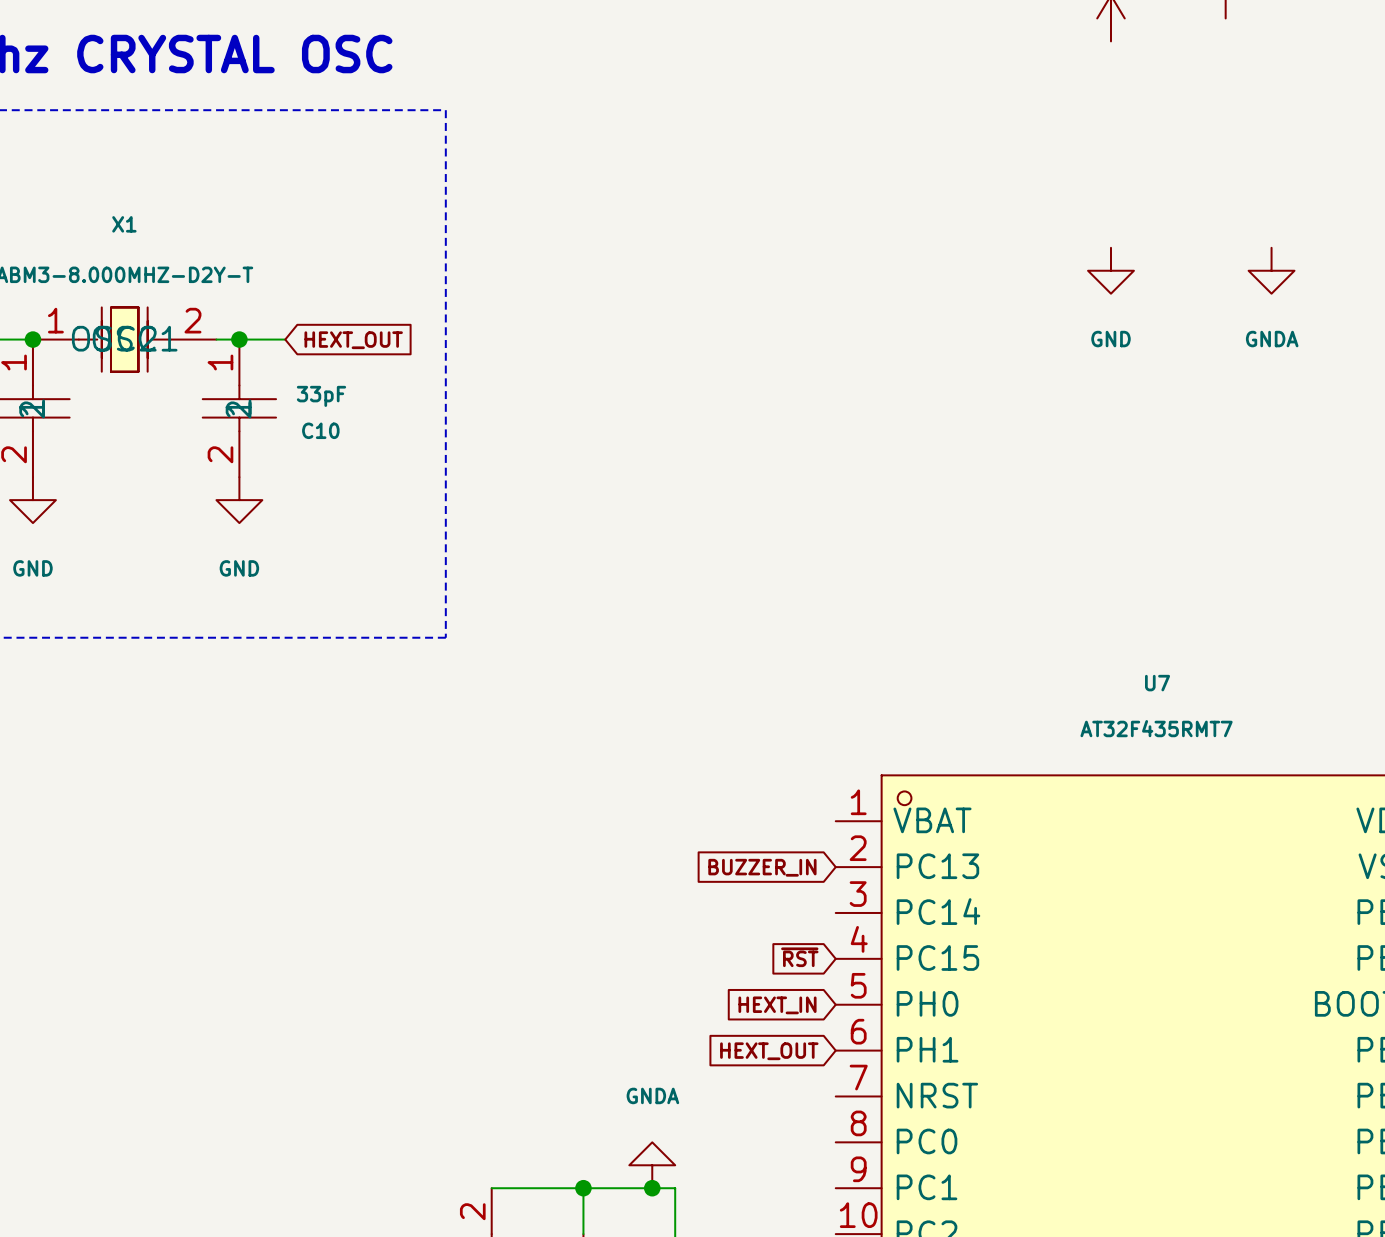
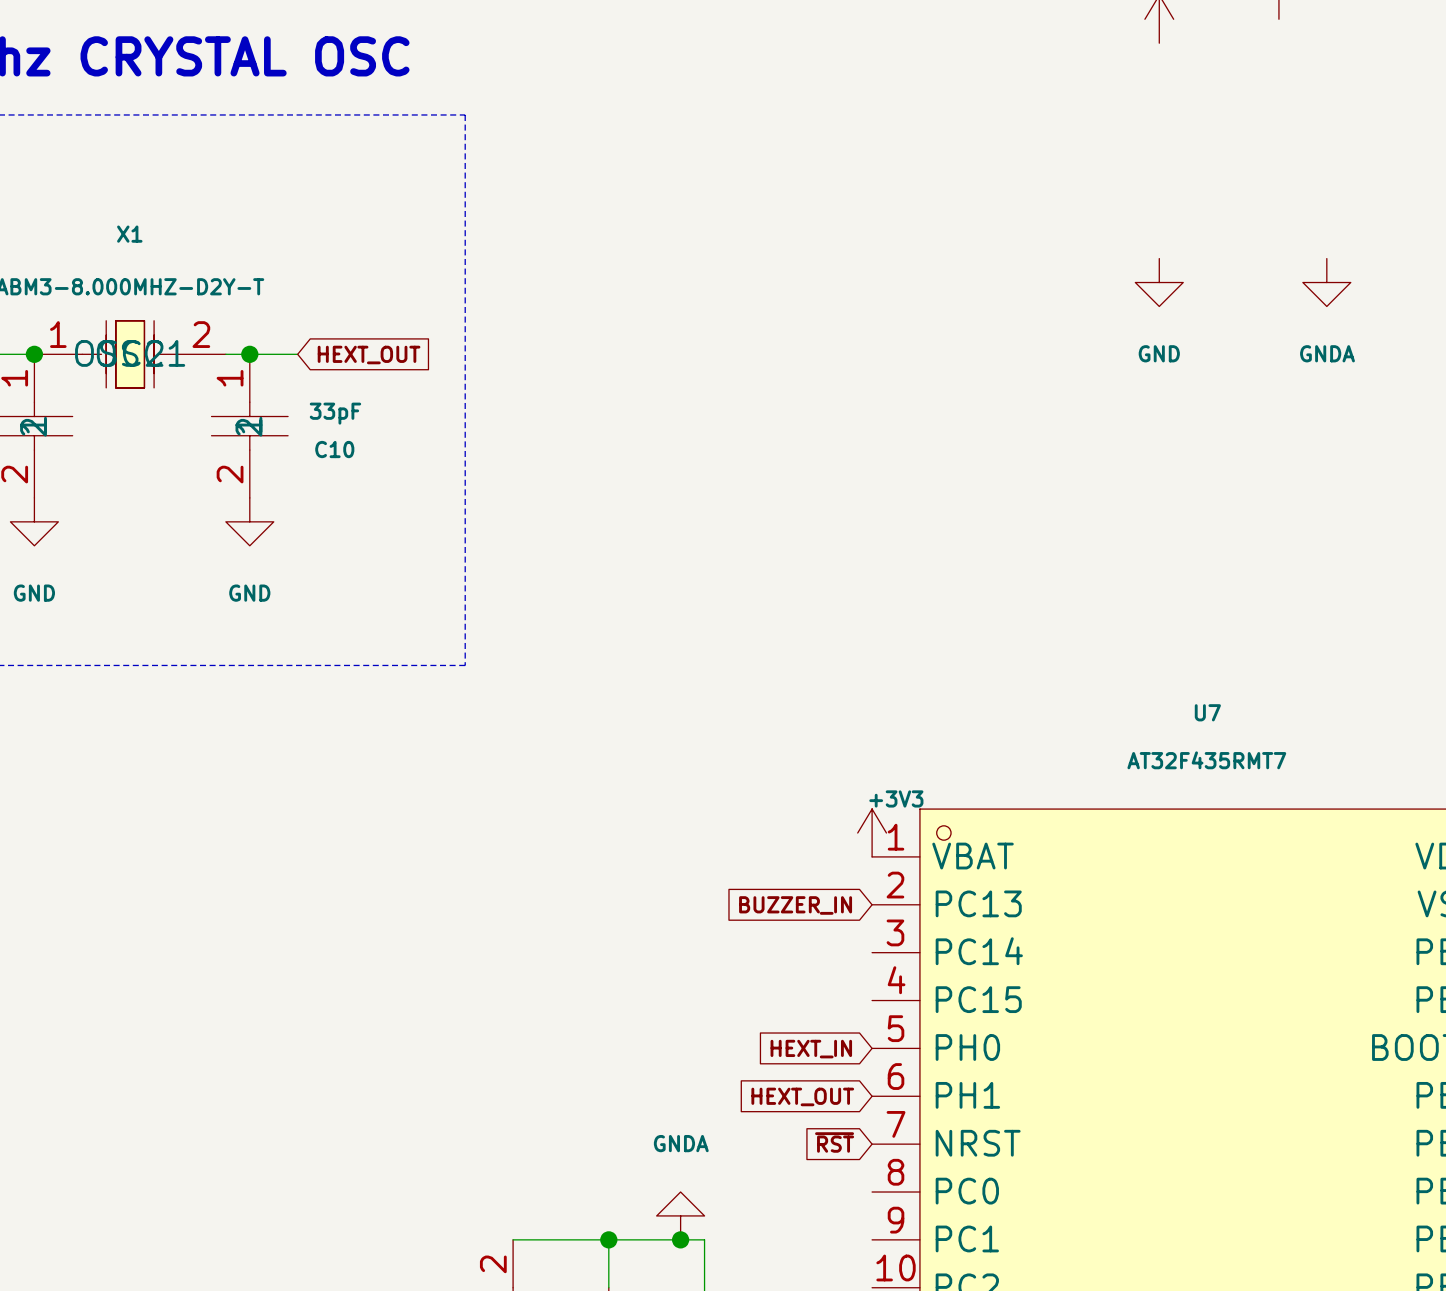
power symbol: none -> +3V3 (872, 833)
global label position: ~{RST} (799, 957) -> ~{RST} (834, 1142)

